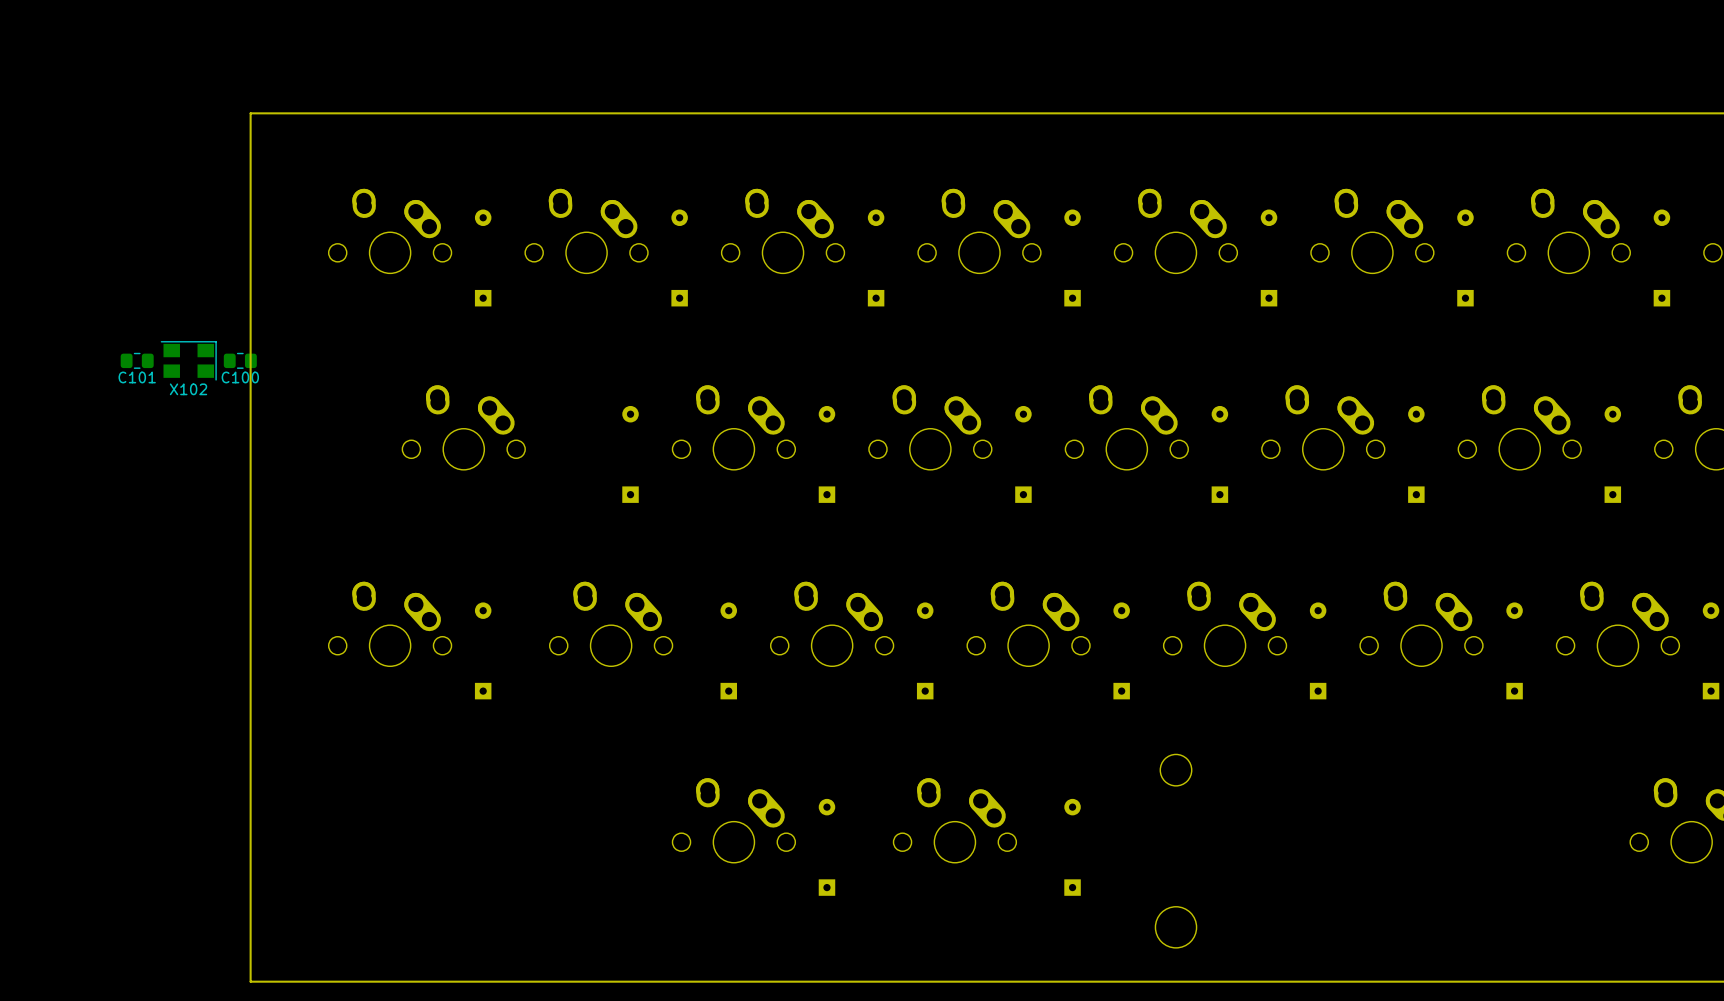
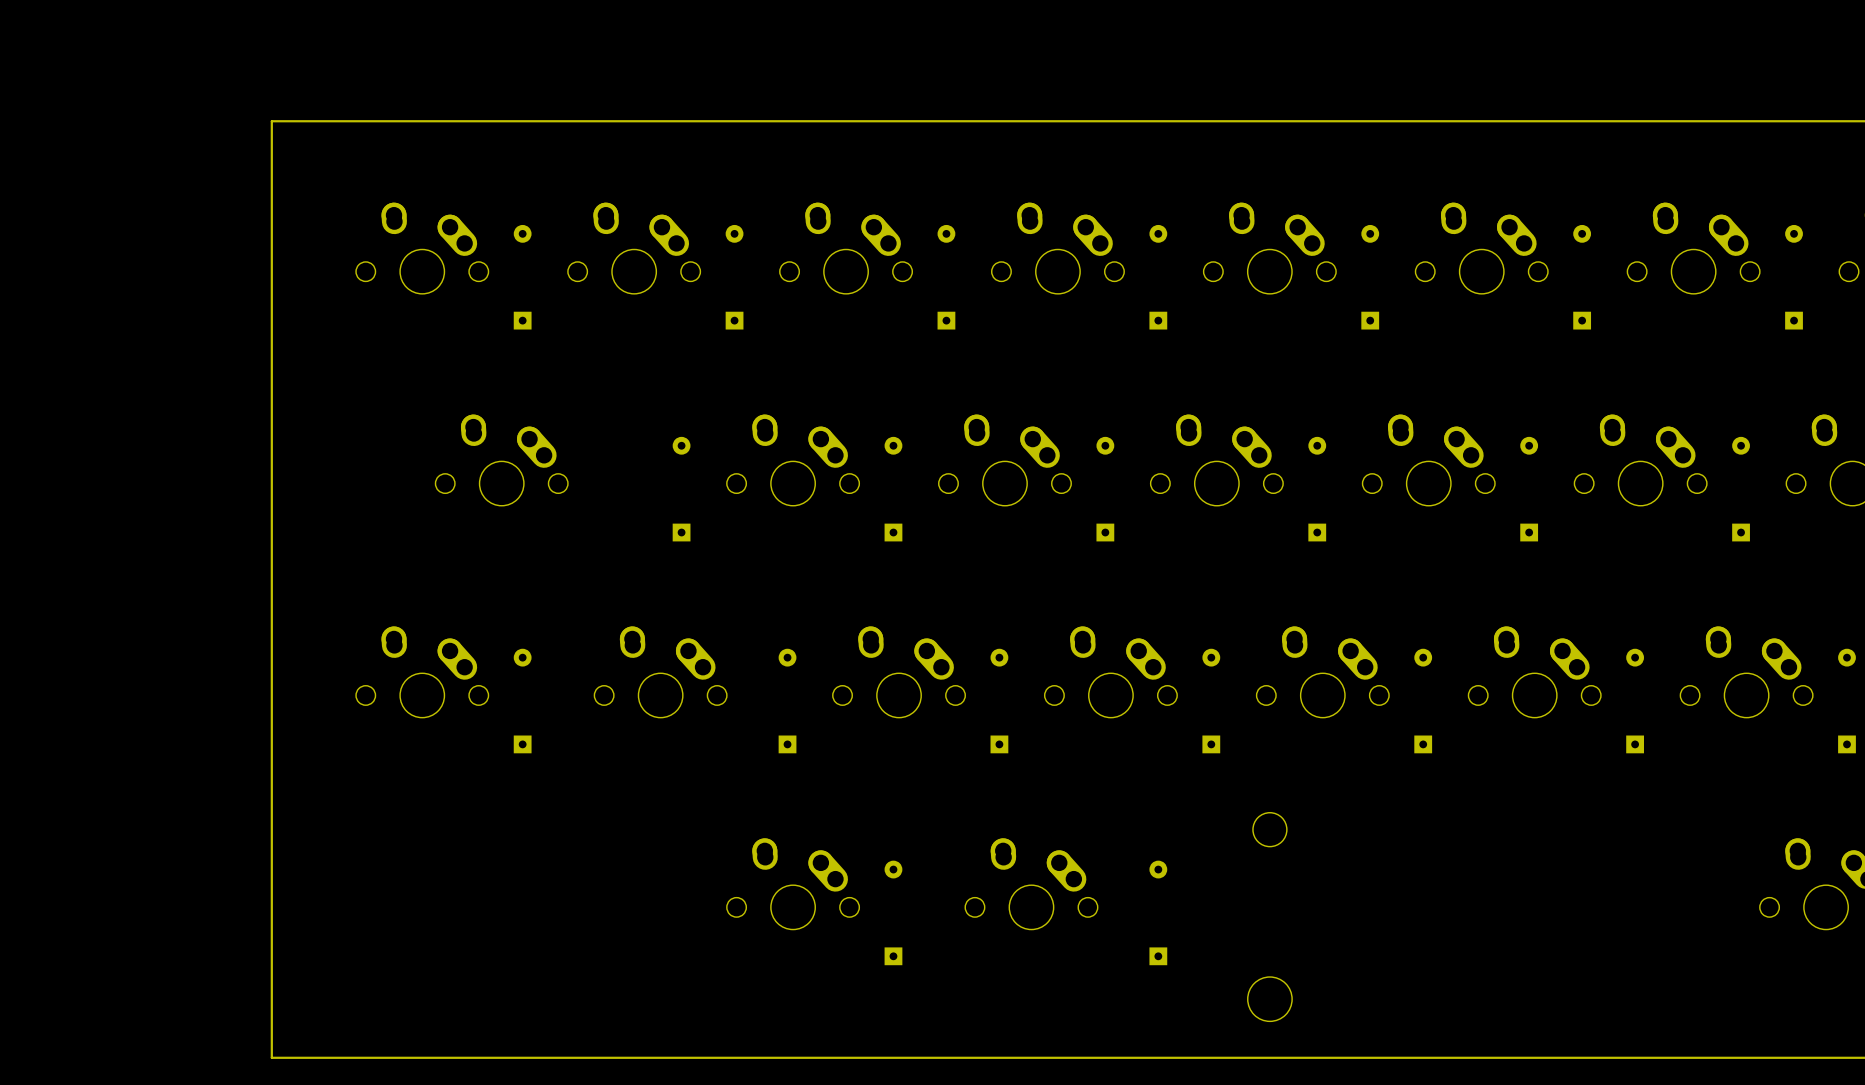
C101: (137, 360) -> none
X102: (188, 360) -> none
C100: (240, 360) -> none

